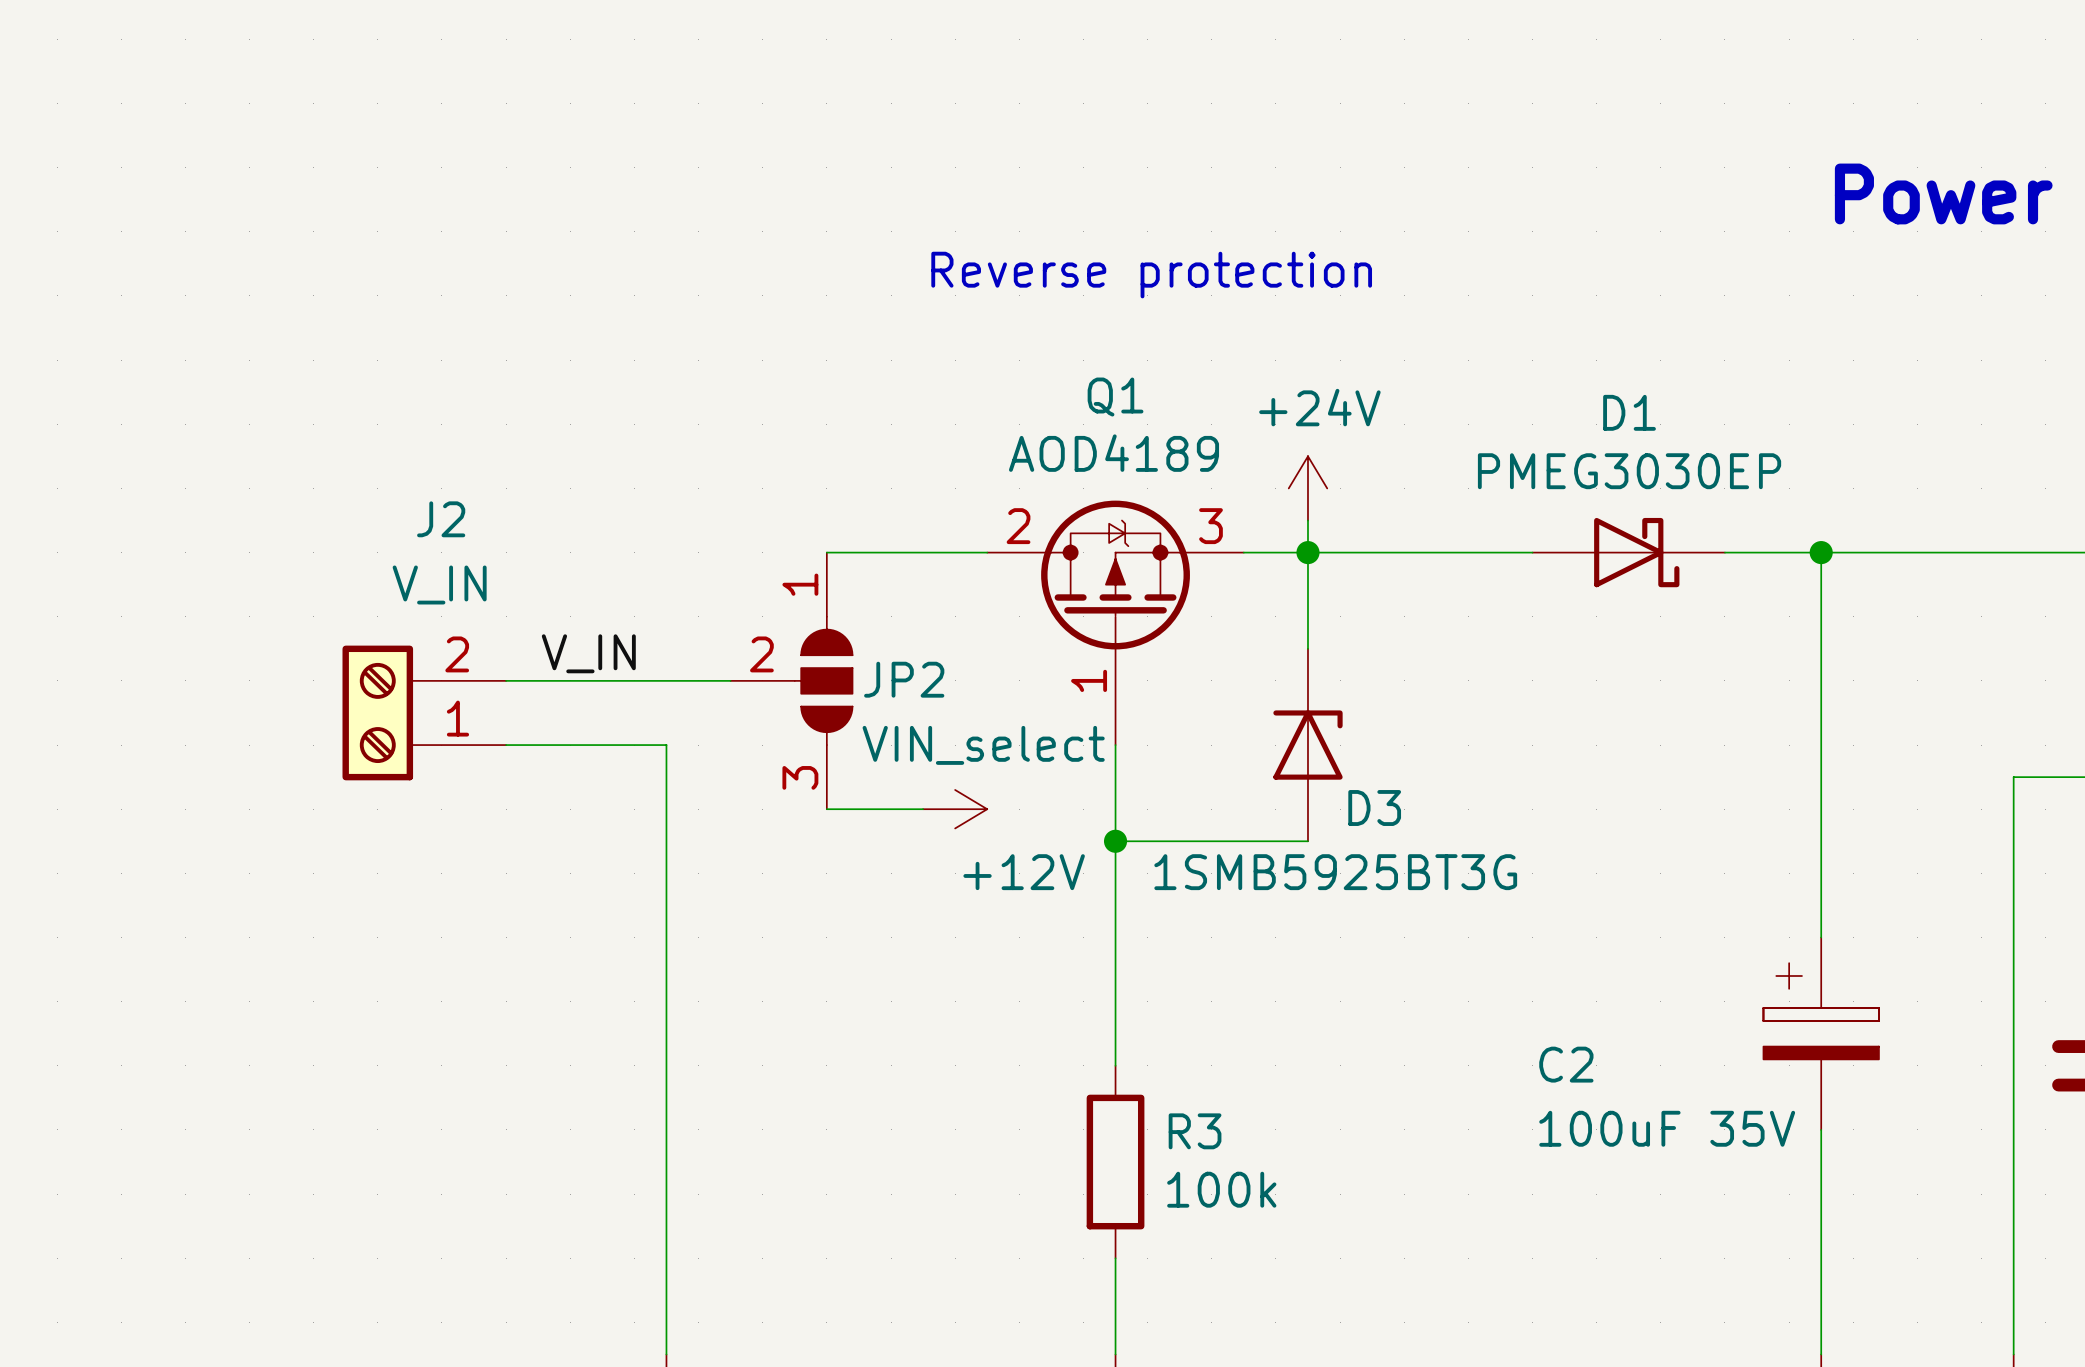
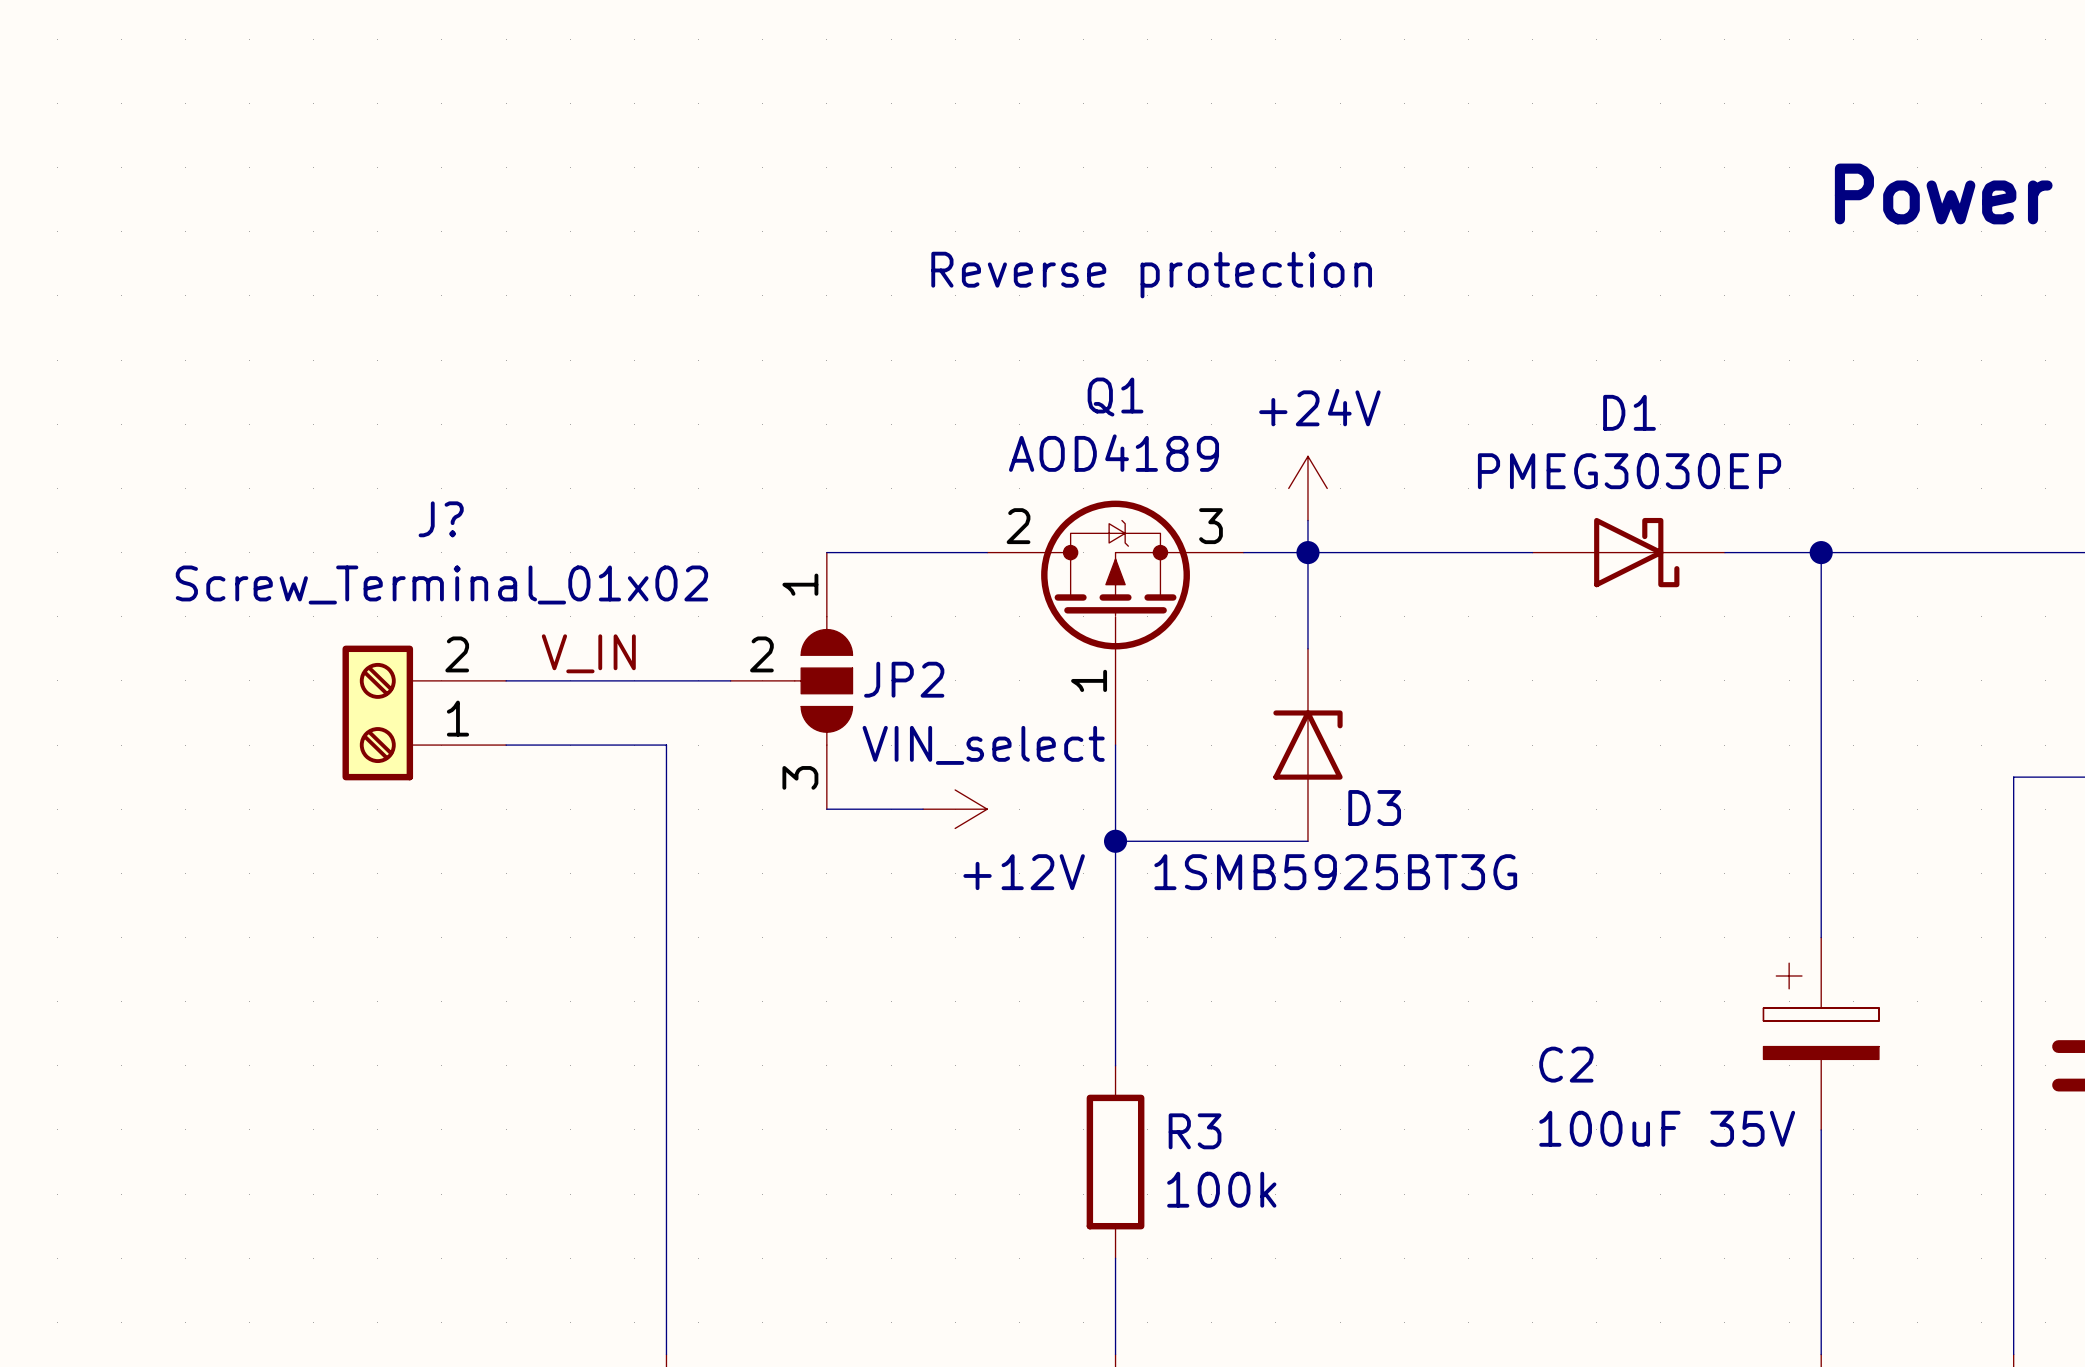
J2 name: J2 (441, 519) -> J? (441, 519)
J2 value: V_IN (439, 584) -> Screw_Terminal_01x02 (441, 584)

